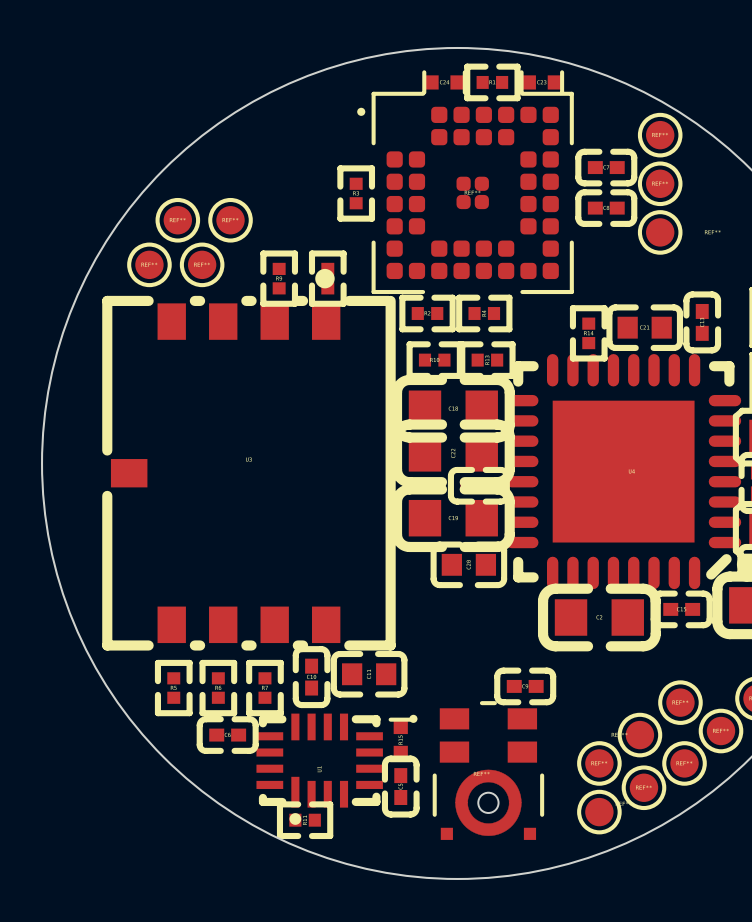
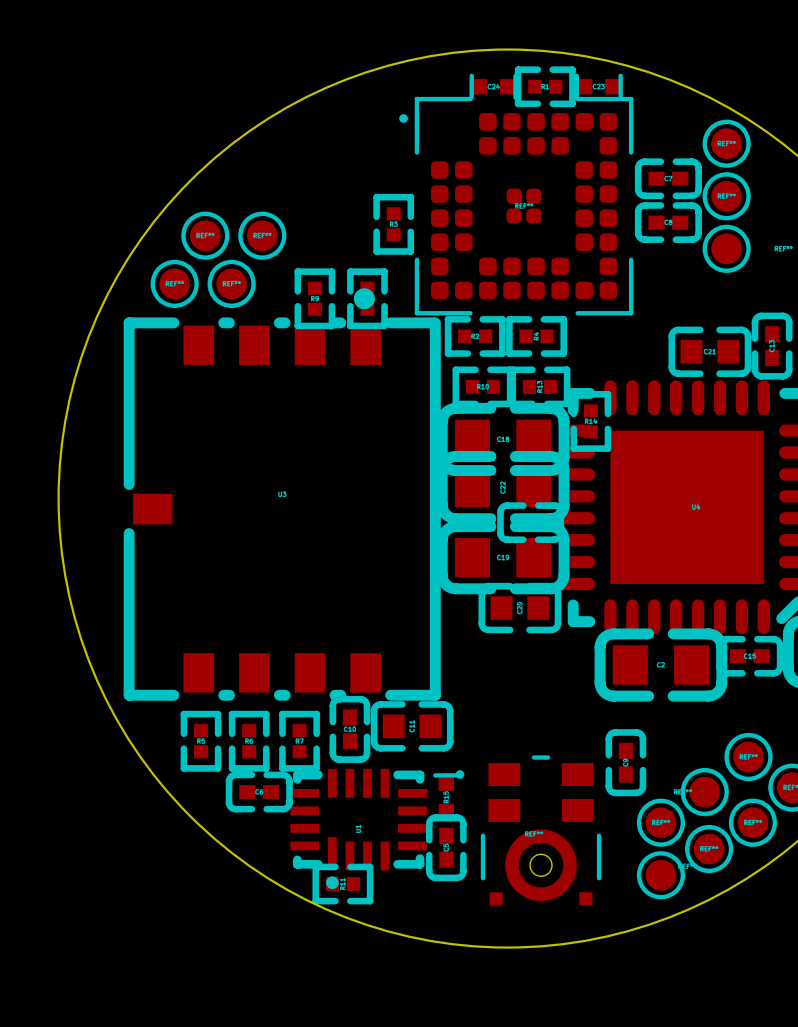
part position: (356, 193) -> (393, 224)
part position: (588, 333) -> (590, 421)
part rotation: 0° (525, 686) -> 90° clockwise (625, 762)
part position: (525, 686) -> (625, 762)

